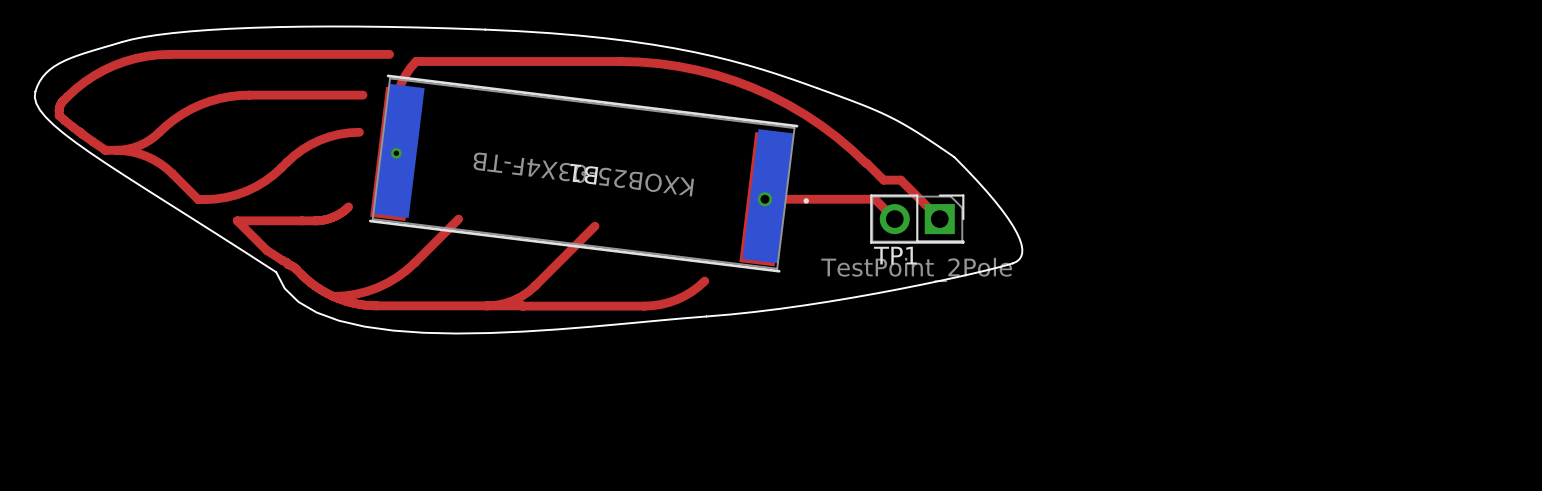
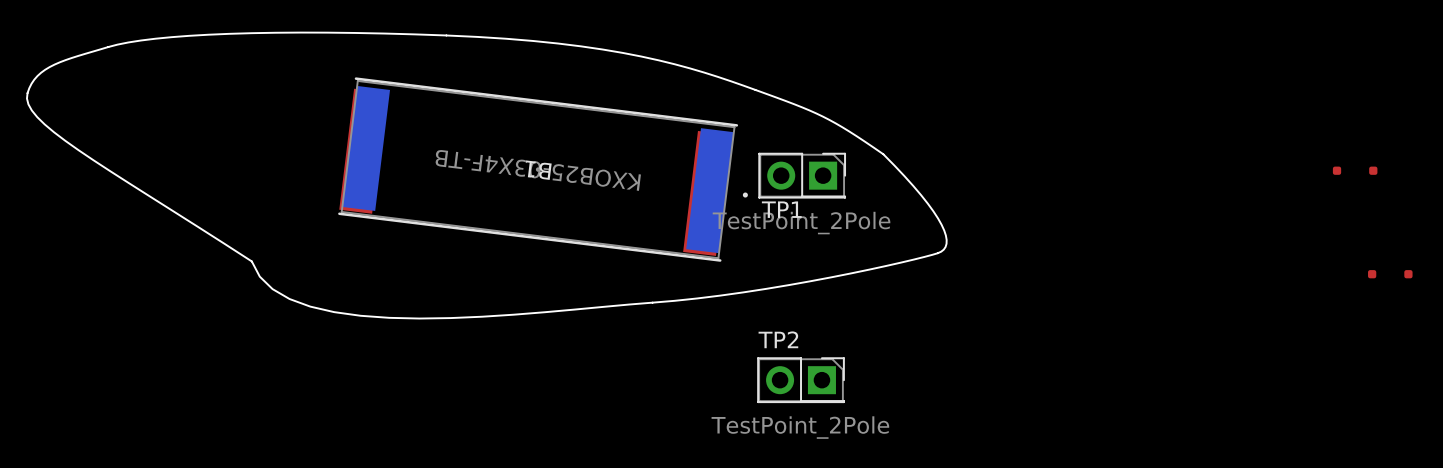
top track: (389, 54) (169, 54) (147, 56) (114, 65) (84, 82) (62, 102) (59, 115) -> none
top track: (363, 95) (249, 95) (219, 98) (200, 104) (182, 113) (144, 143) (127, 149) (115, 150) -> none
top track: (59, 115) (82, 134) -> none
top track: (359, 132) (339, 134) (320, 140) (302, 149) (273, 174) (255, 186) (236, 194) (215, 199) (198, 199) (166, 168) (153, 159) (139, 153) (115, 150) -> none
top track: (82, 134) (105, 150) (115, 150) -> none
top track: (396, 153) (395, 110) (398, 92) (405, 75) (416, 61) (620, 61) (659, 63) (716, 75) (753, 87) (788, 104) (836, 137) (883, 180) (900, 180) (939, 219) -> none
via: (396, 153) -> none
part: none -> (1355, 170)
top track: (764, 199) (874, 199) (894, 219) -> none
via: (764, 199) -> none
top track: (348, 206) (336, 215) (321, 220) (237, 220) (266, 250) (294, 267) (317, 287) (345, 300) (375, 305) (522, 305) -> none
top track: (458, 219) (415, 262) (397, 277) (366, 291) (333, 296) -> none
TP1 position: (917, 219) -> (802, 175)
top track: (594, 226) (528, 291) (513, 300) (486, 305) -> none
top track: (704, 281) (684, 296) (669, 302) (652, 305) (522, 306) -> none
part: none -> (1390, 274)
TP2: none -> TestPoint_2Pole (801, 380)

